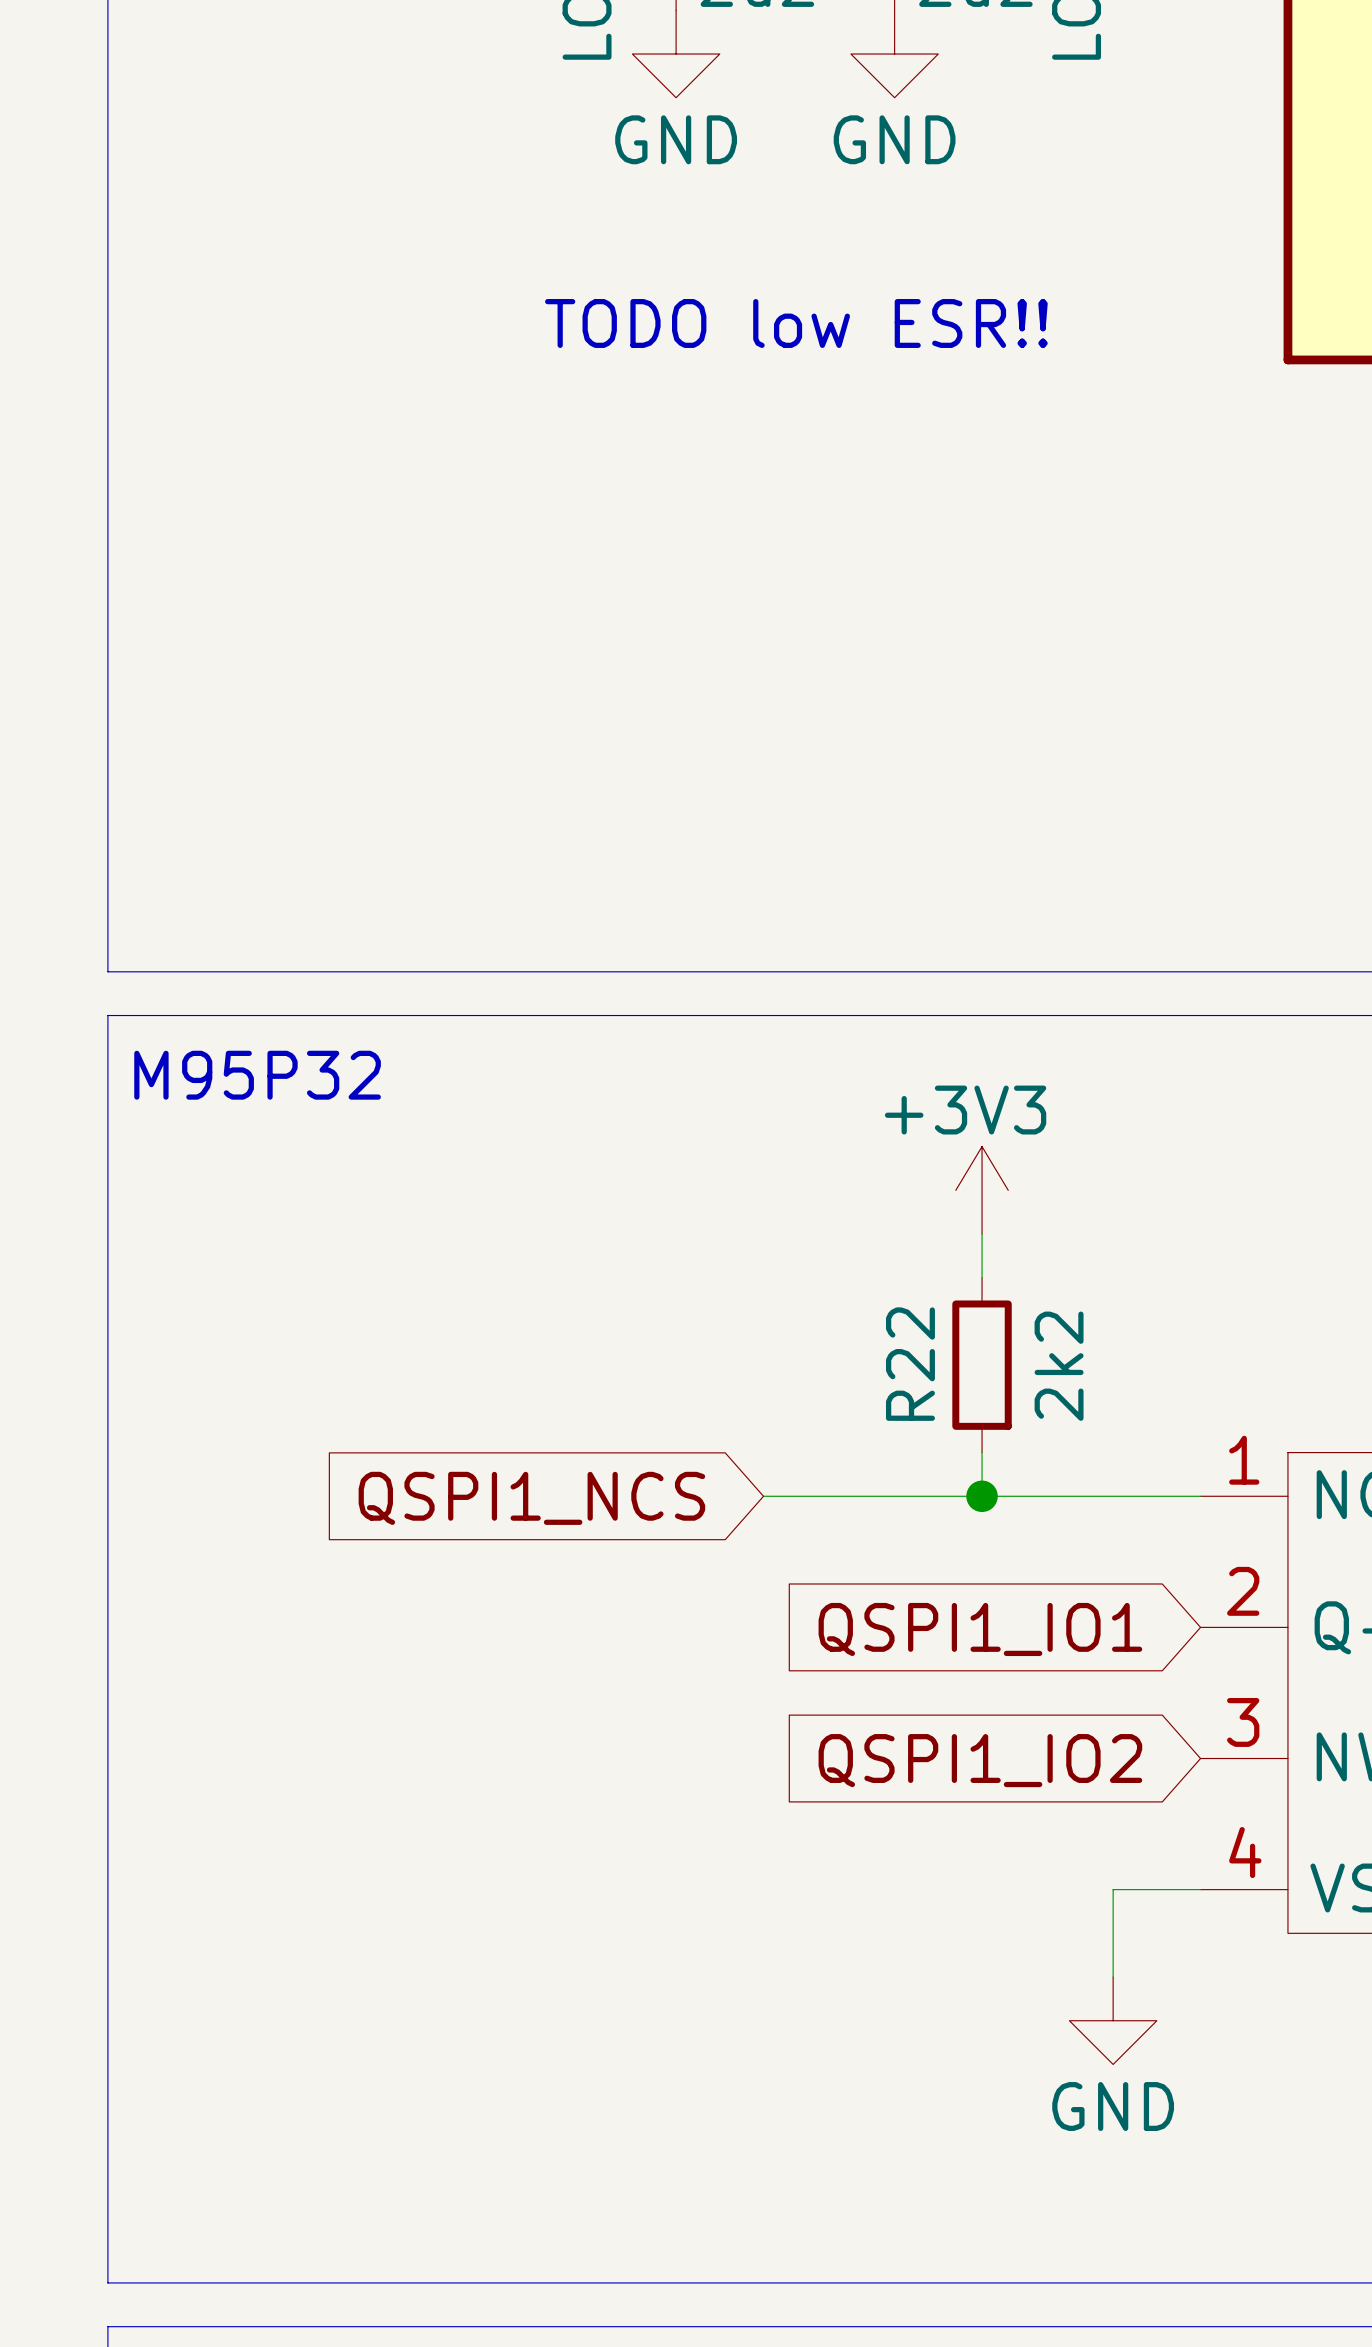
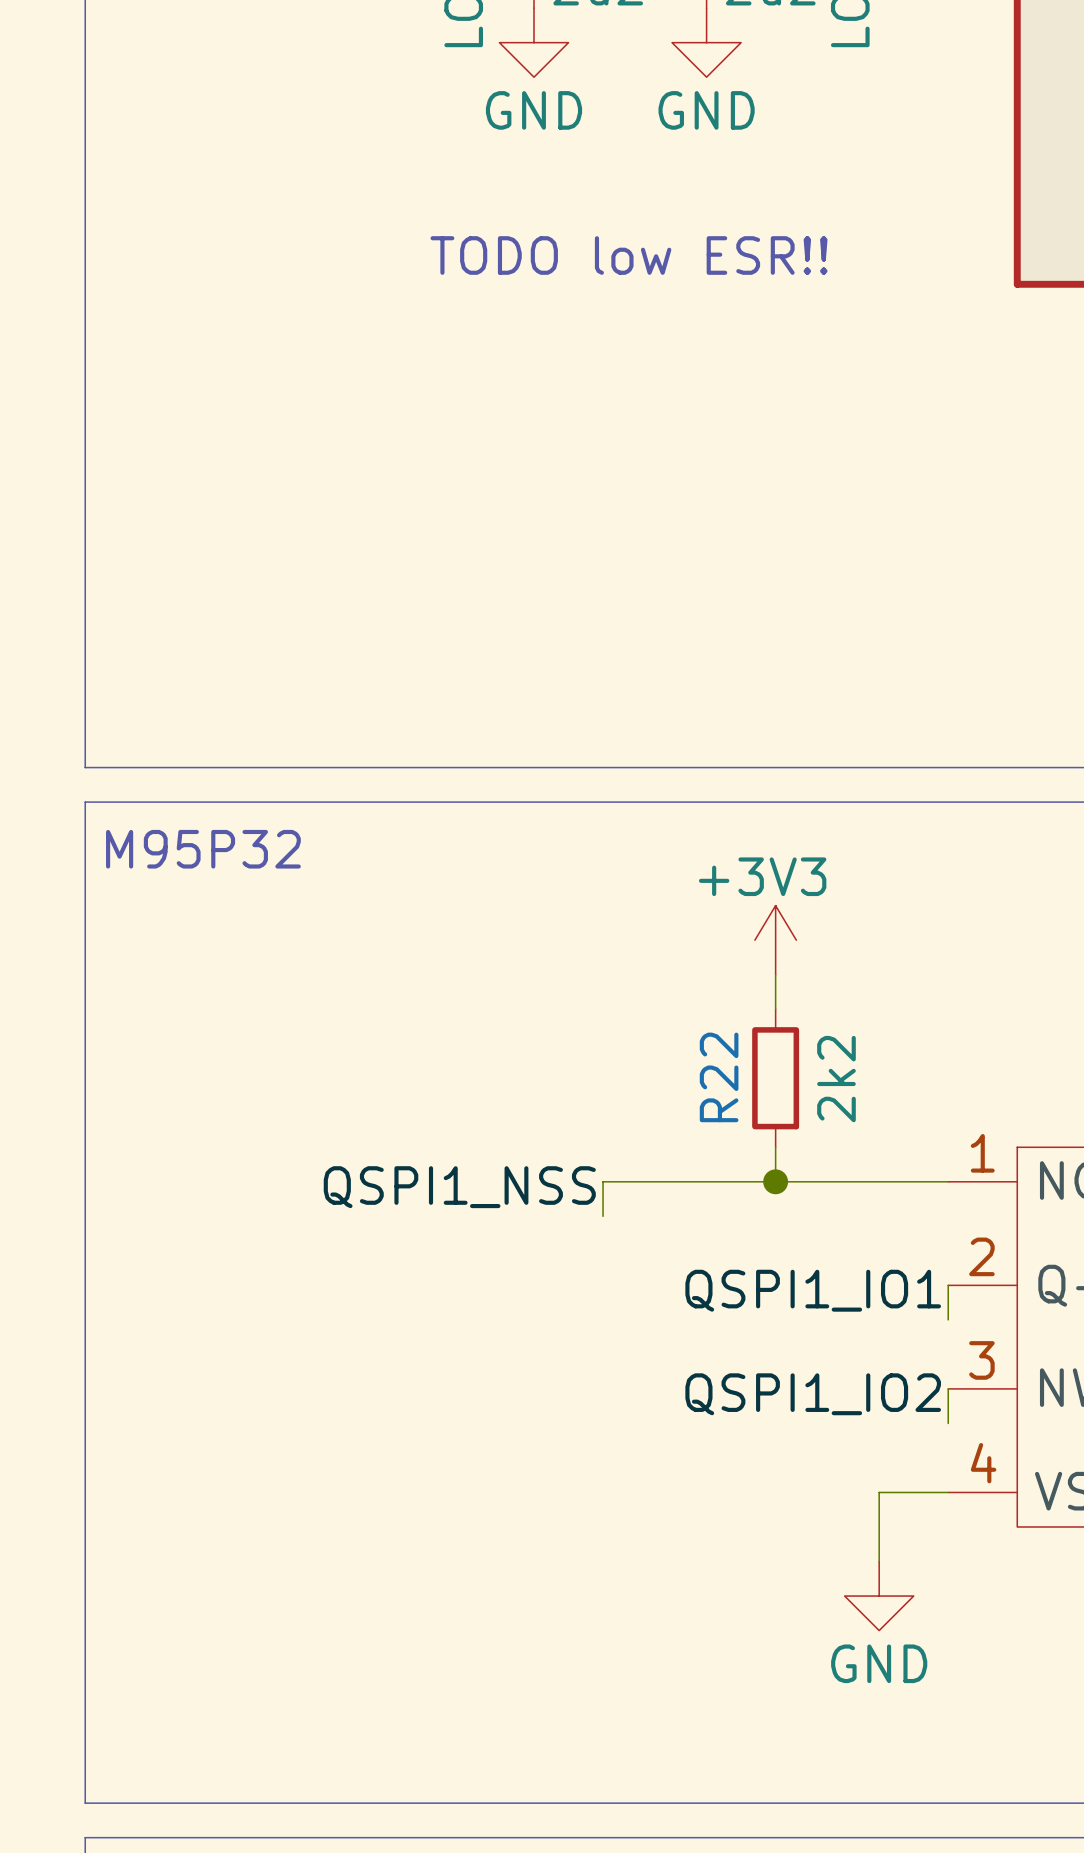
wire: none -> (603, 1181) (603, 1216)
global label: QSPI1_NCS (531, 1498) -> none
label: none -> QSPI1_NSS (459, 1187)
wire: none -> (948, 1285) (948, 1319)
global label: QSPI1_IO1 (980, 1629) -> none
label: none -> QSPI1_IO1 (813, 1290)
wire: none -> (948, 1388) (948, 1423)
global label: QSPI1_IO2 (980, 1760) -> none
label: none -> QSPI1_IO2 (813, 1394)

